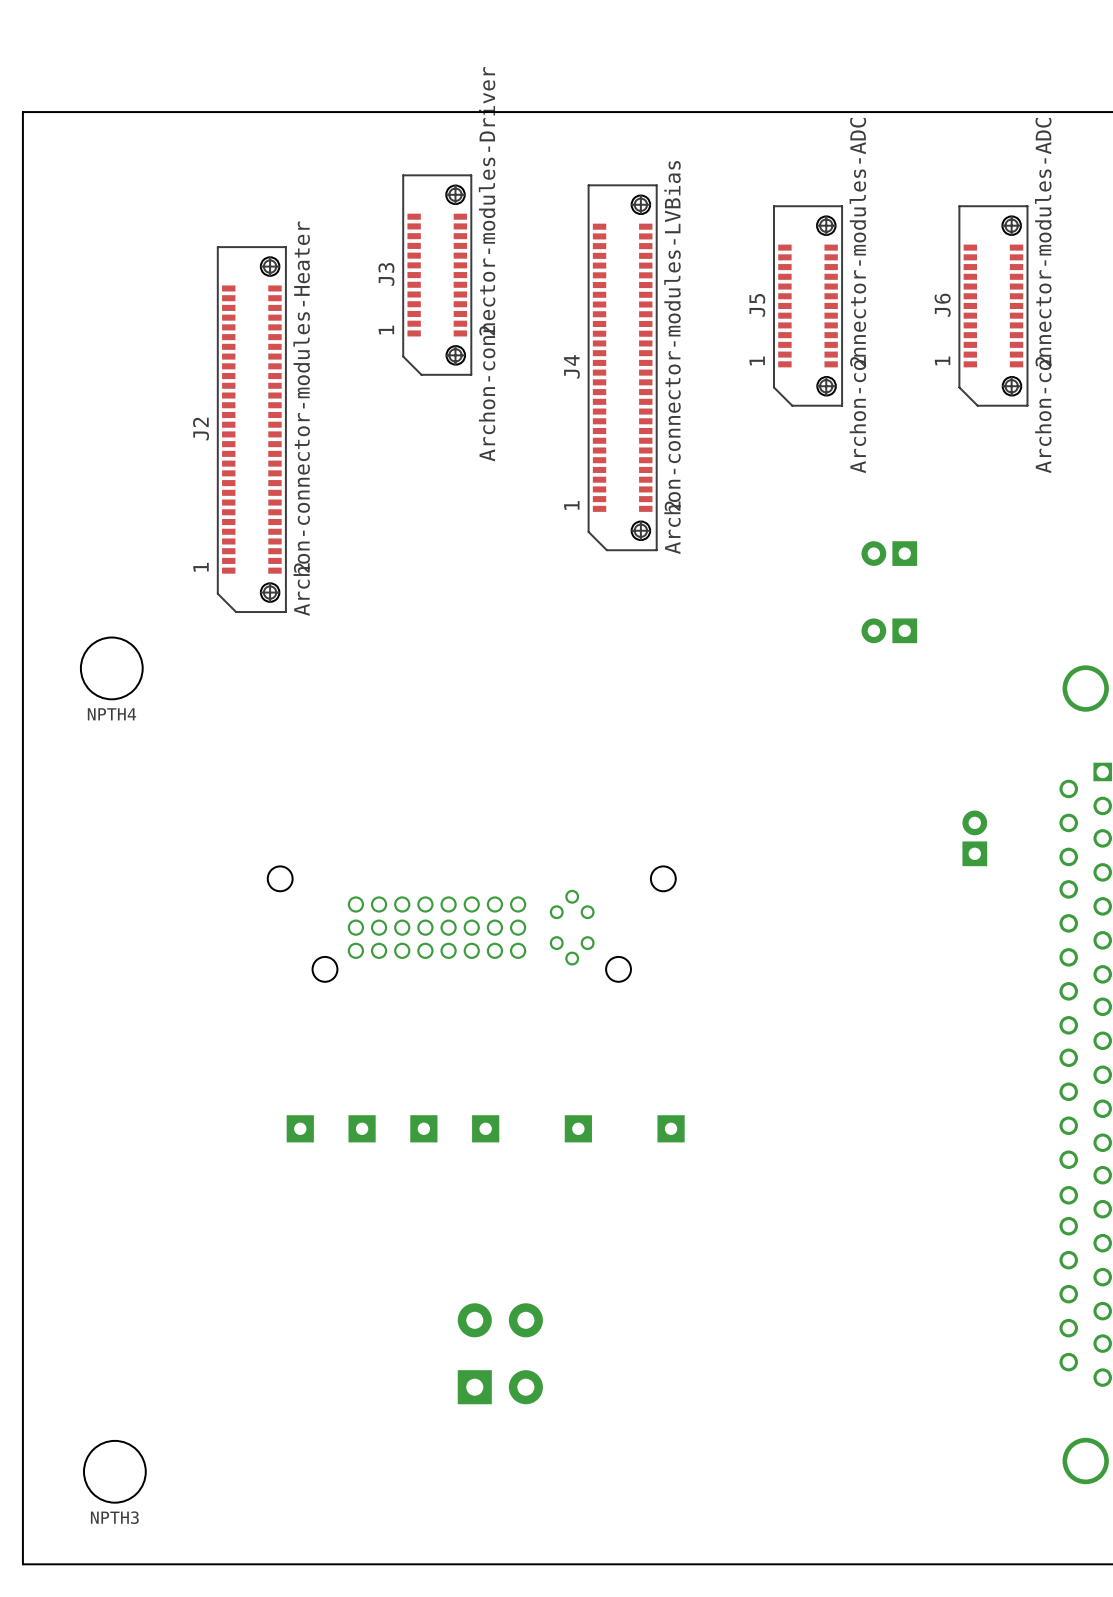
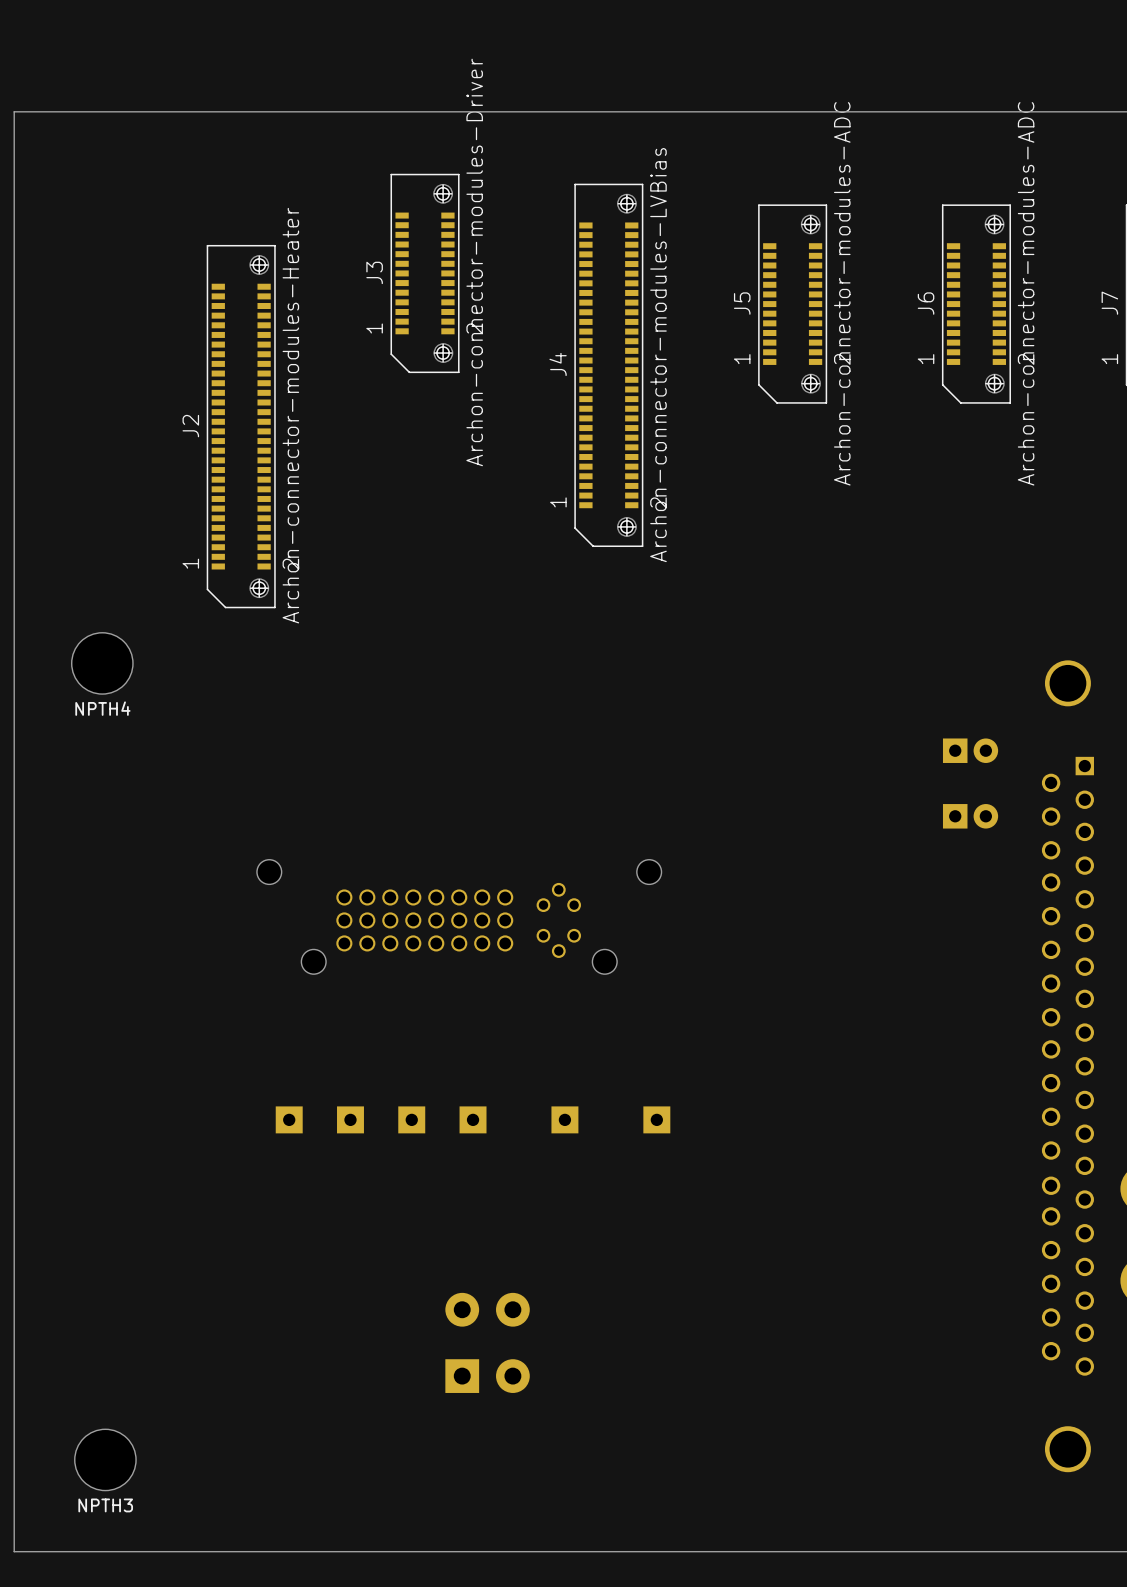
part: (889, 553) -> none
part: (889, 630) -> none
part: none -> (970, 750)
part rotation: 0° (974, 838) -> 90° clockwise (970, 816)

